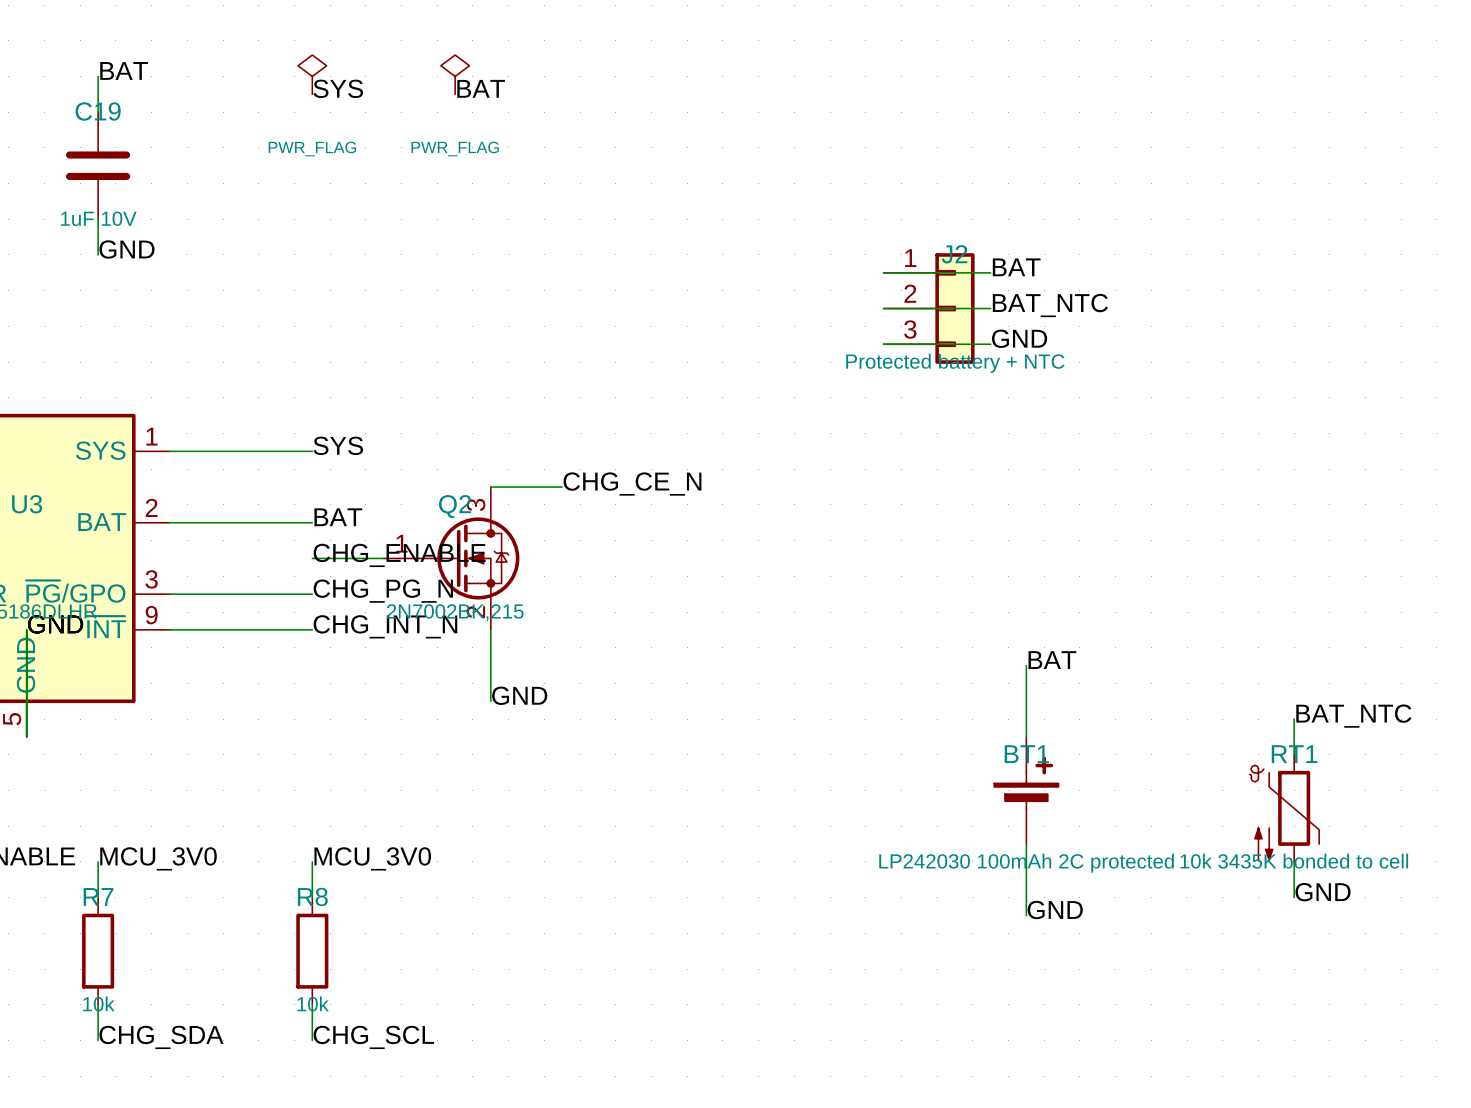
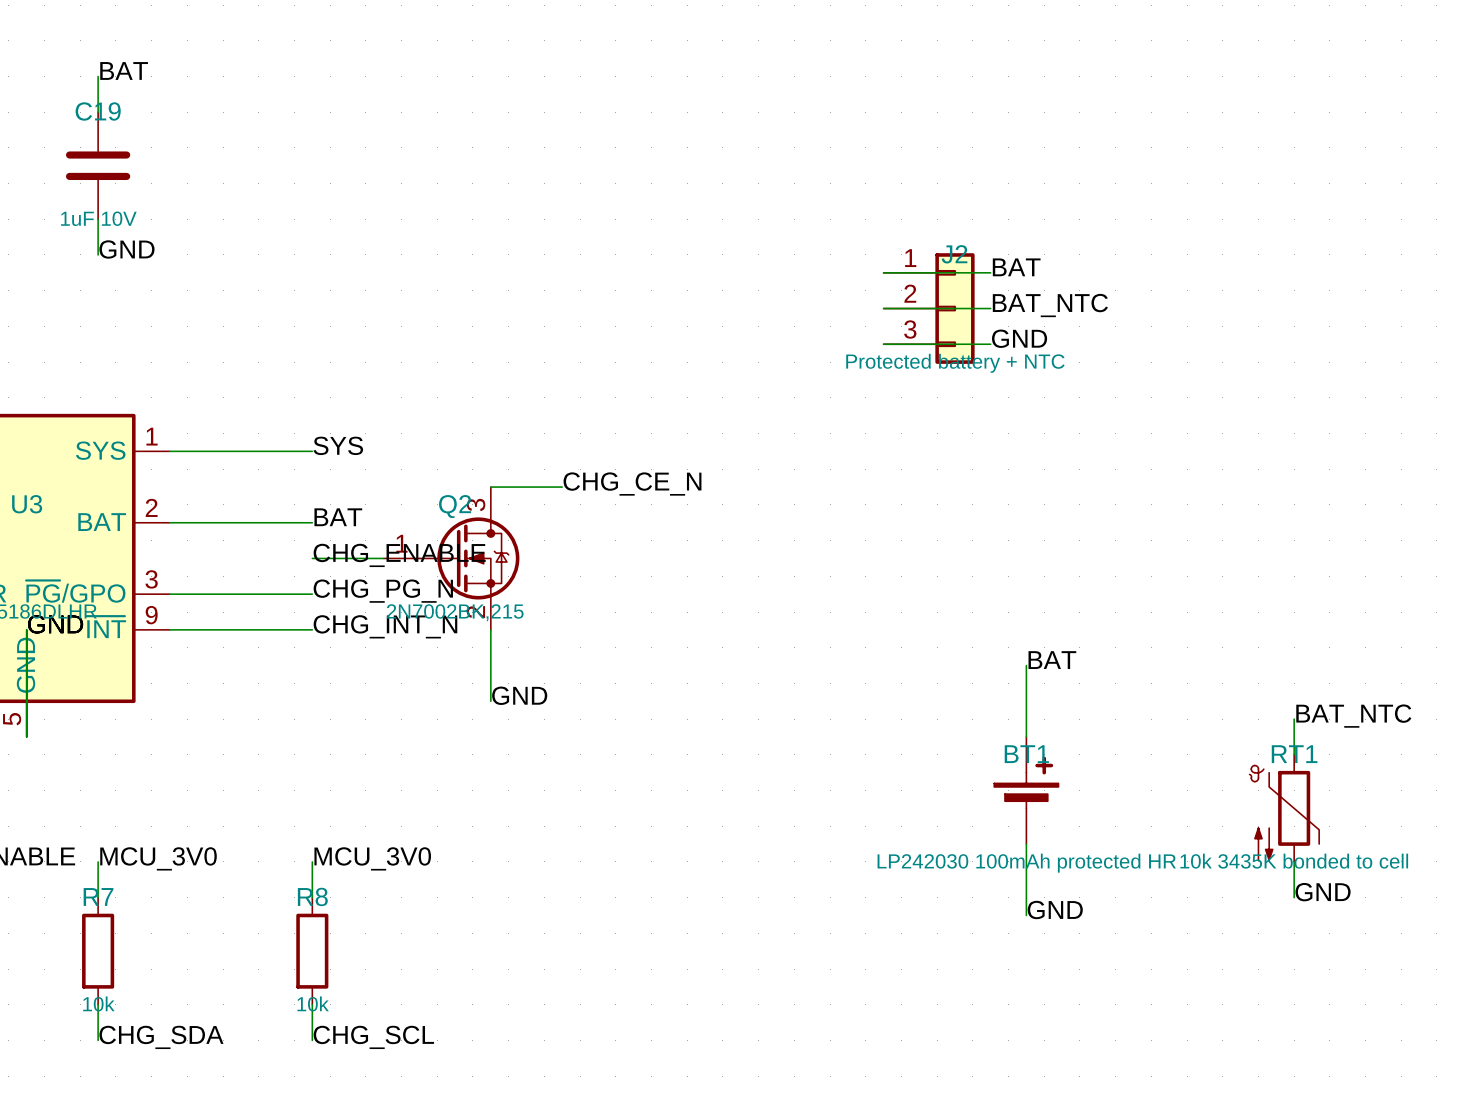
power symbol: PWR_FLAG (312, 74) -> none
power symbol: PWR_FLAG (455, 74) -> none
label: SYS (338, 88) -> none
label: BAT (481, 88) -> none
BT1 value: LP242030 100mAh 2C protected (1026, 863) -> LP242030 100mAh protected HR (1026, 863)

